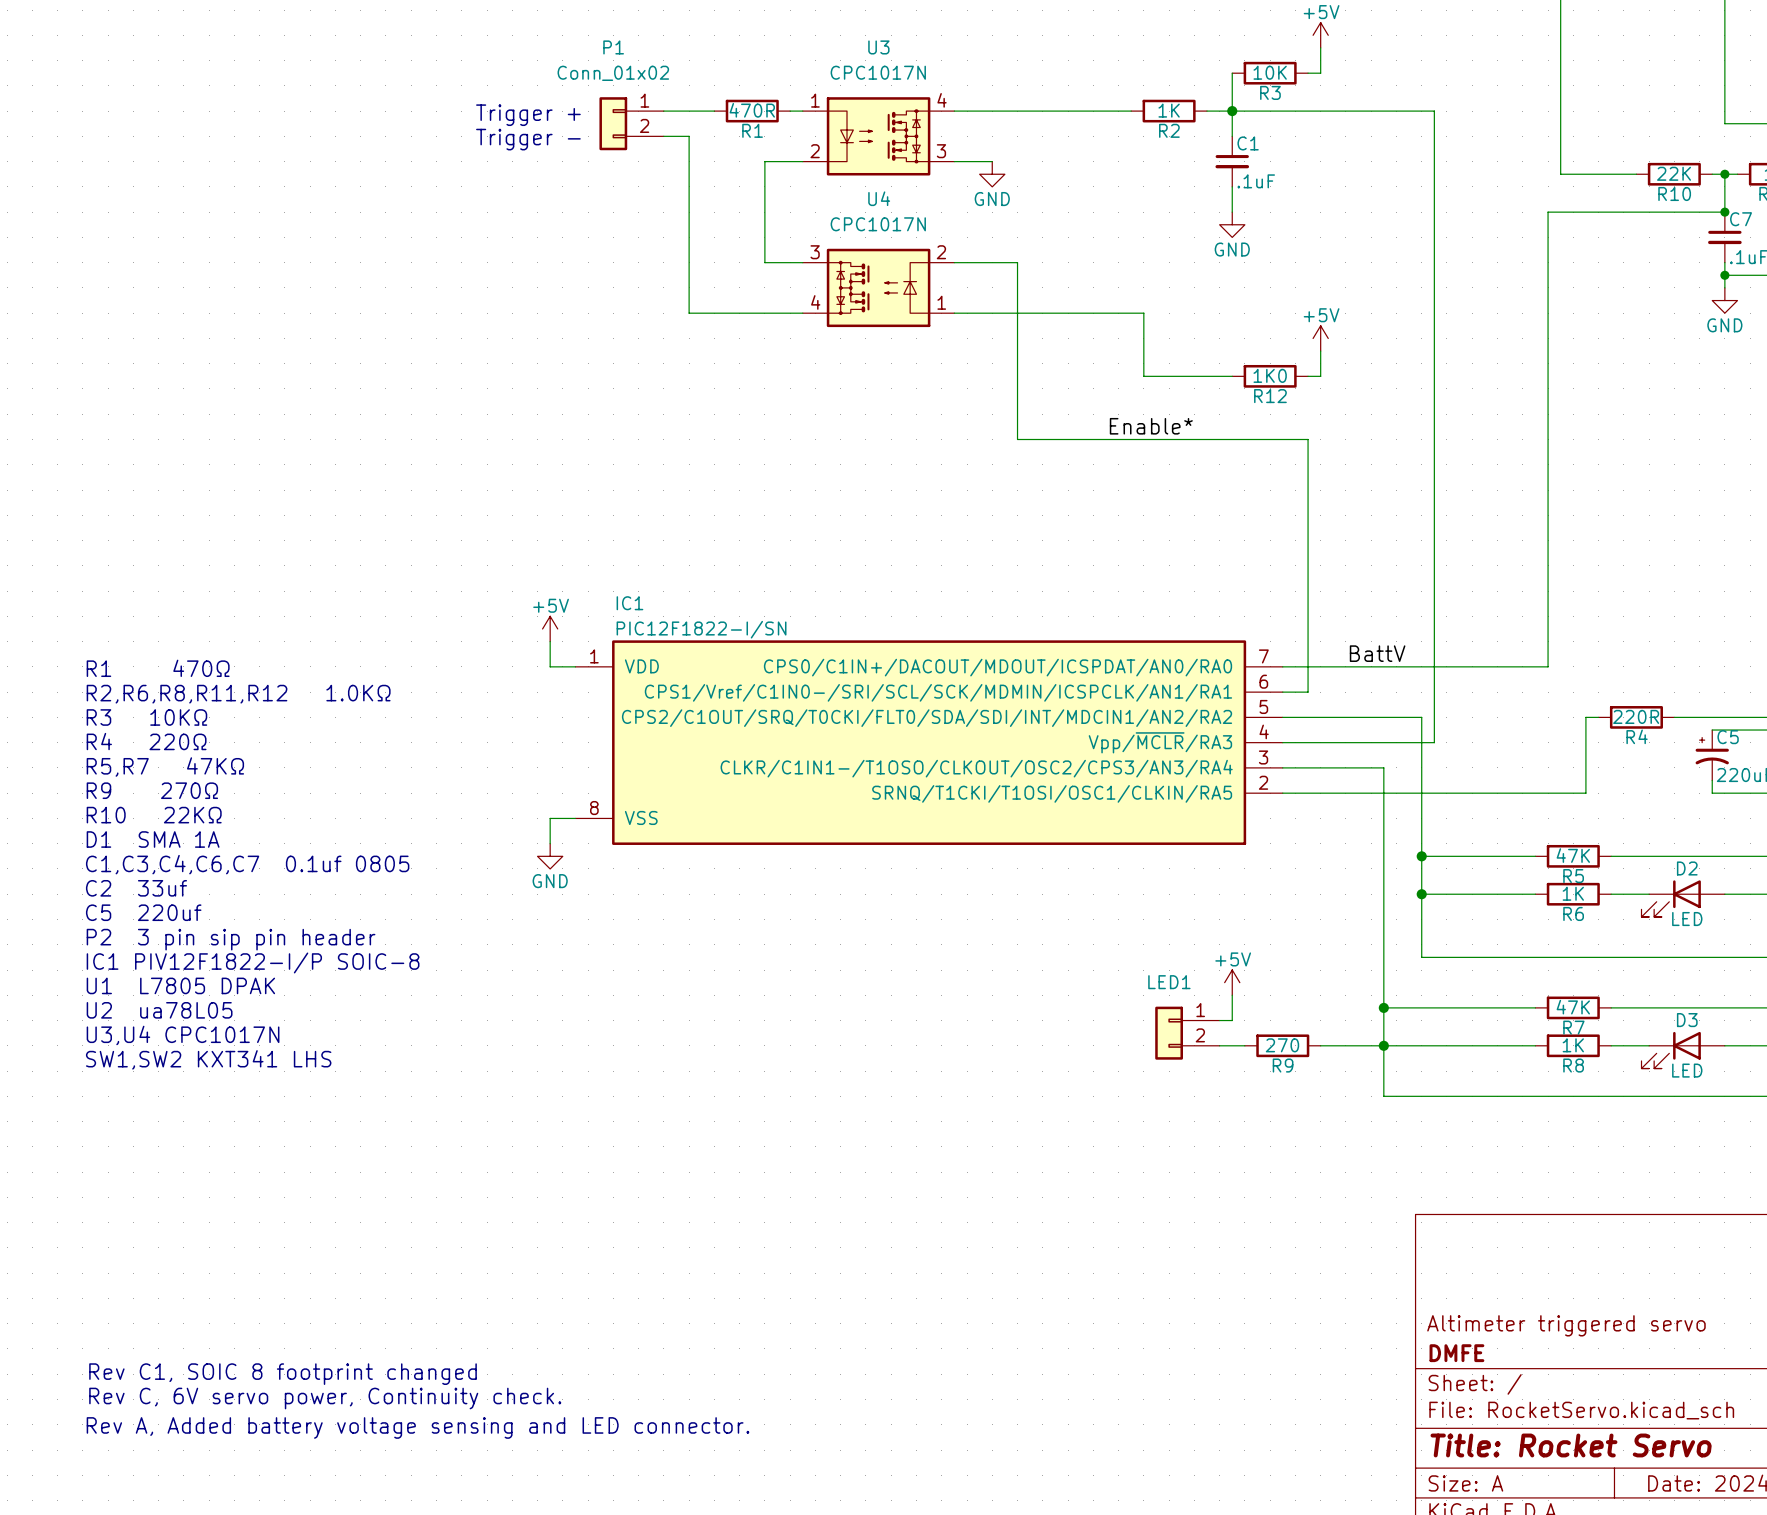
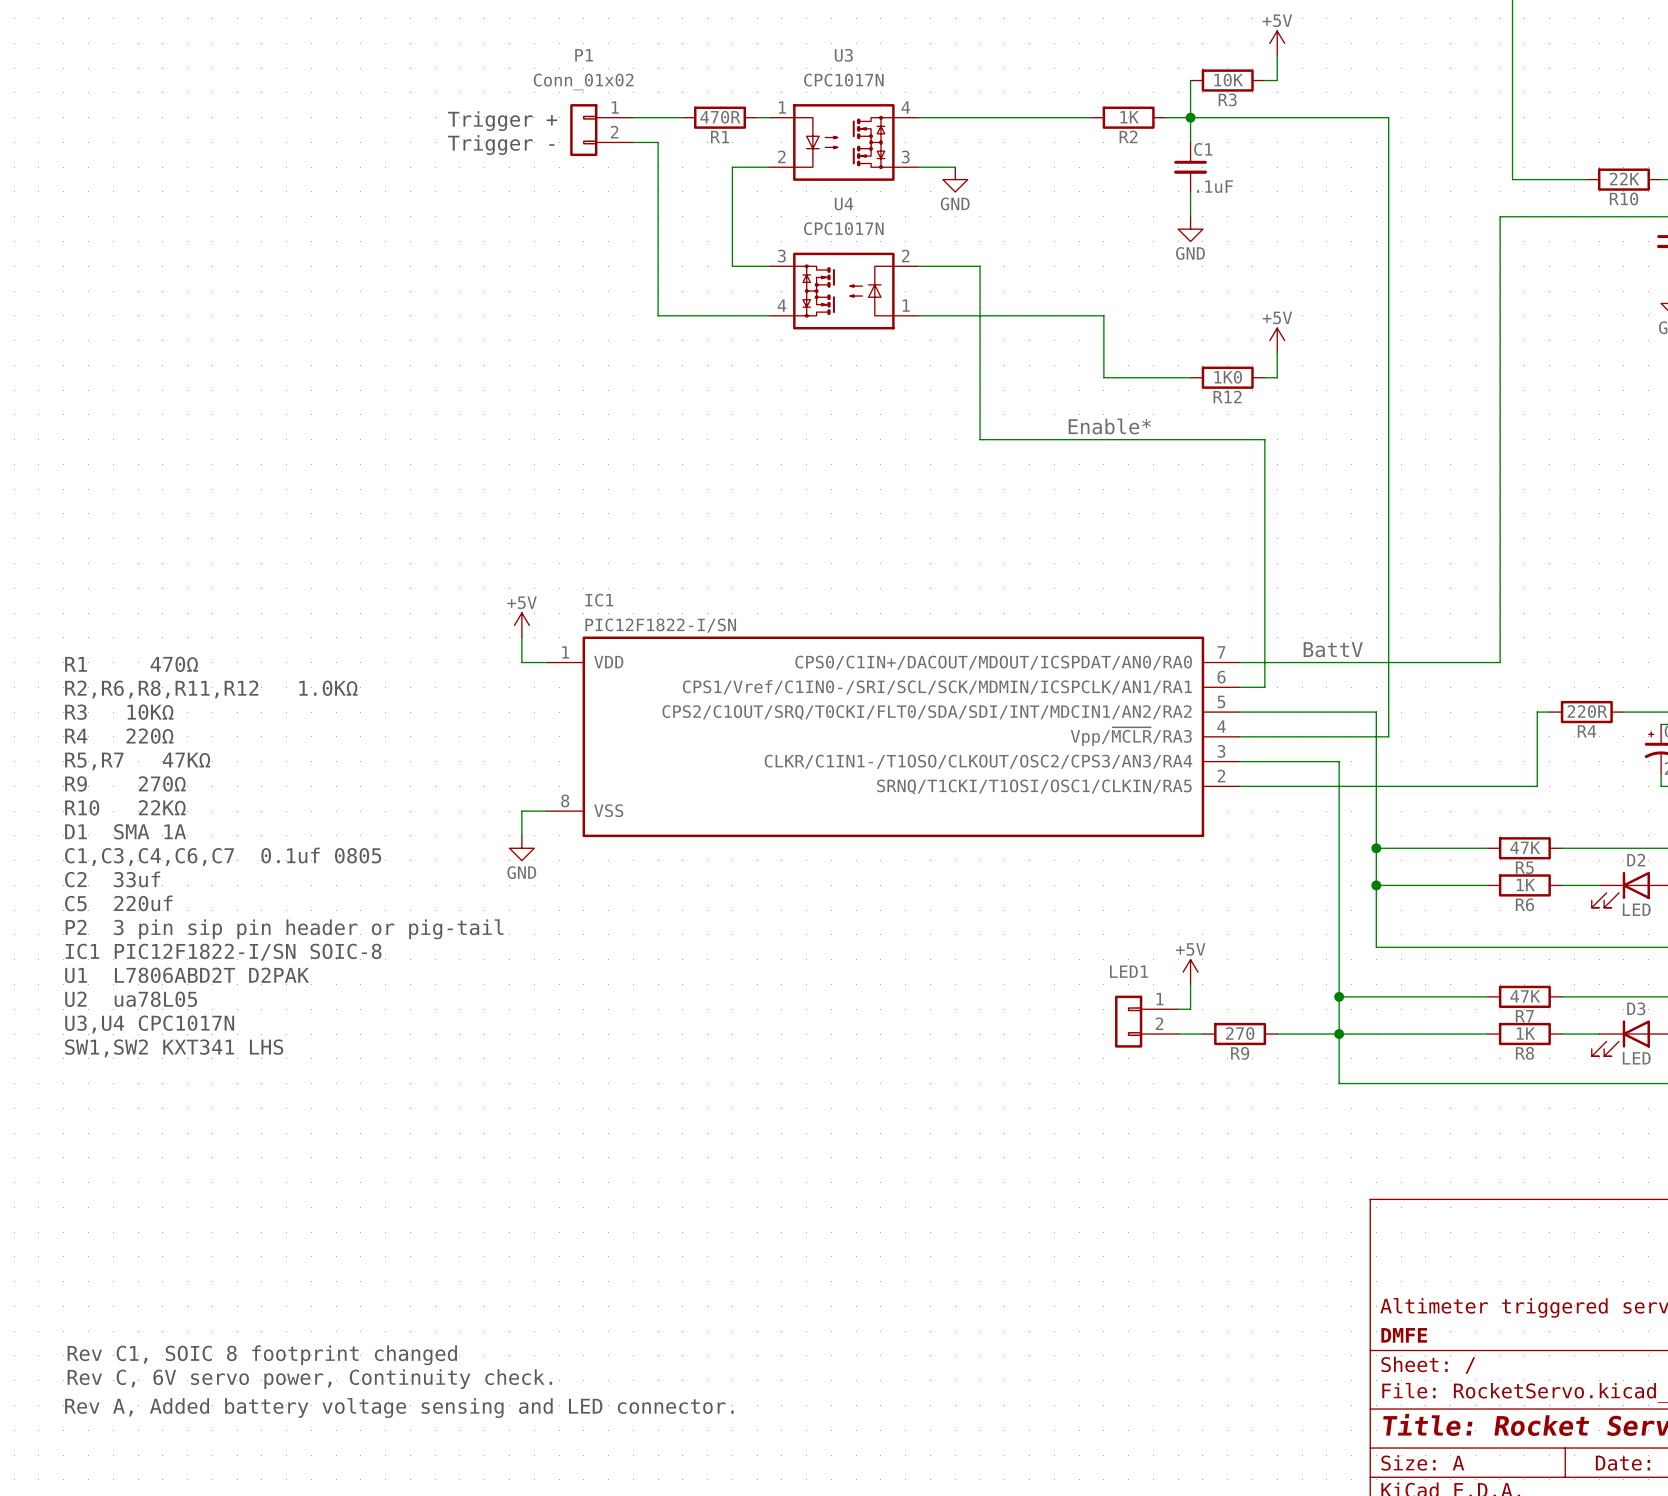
text: P2 3 pin sip pin header (231, 939) -> P2 3 pin sip pin header or pig-tail (284, 929)
text: IC1 PIV12F1822-I/P SOIC-8 (253, 962) -> IC1 PIC12F1822-I/SN SOIC-8 (223, 952)
text: U1 L7805 DPAK (180, 985) -> U1 L7806ABD2T D2PAK (187, 975)

